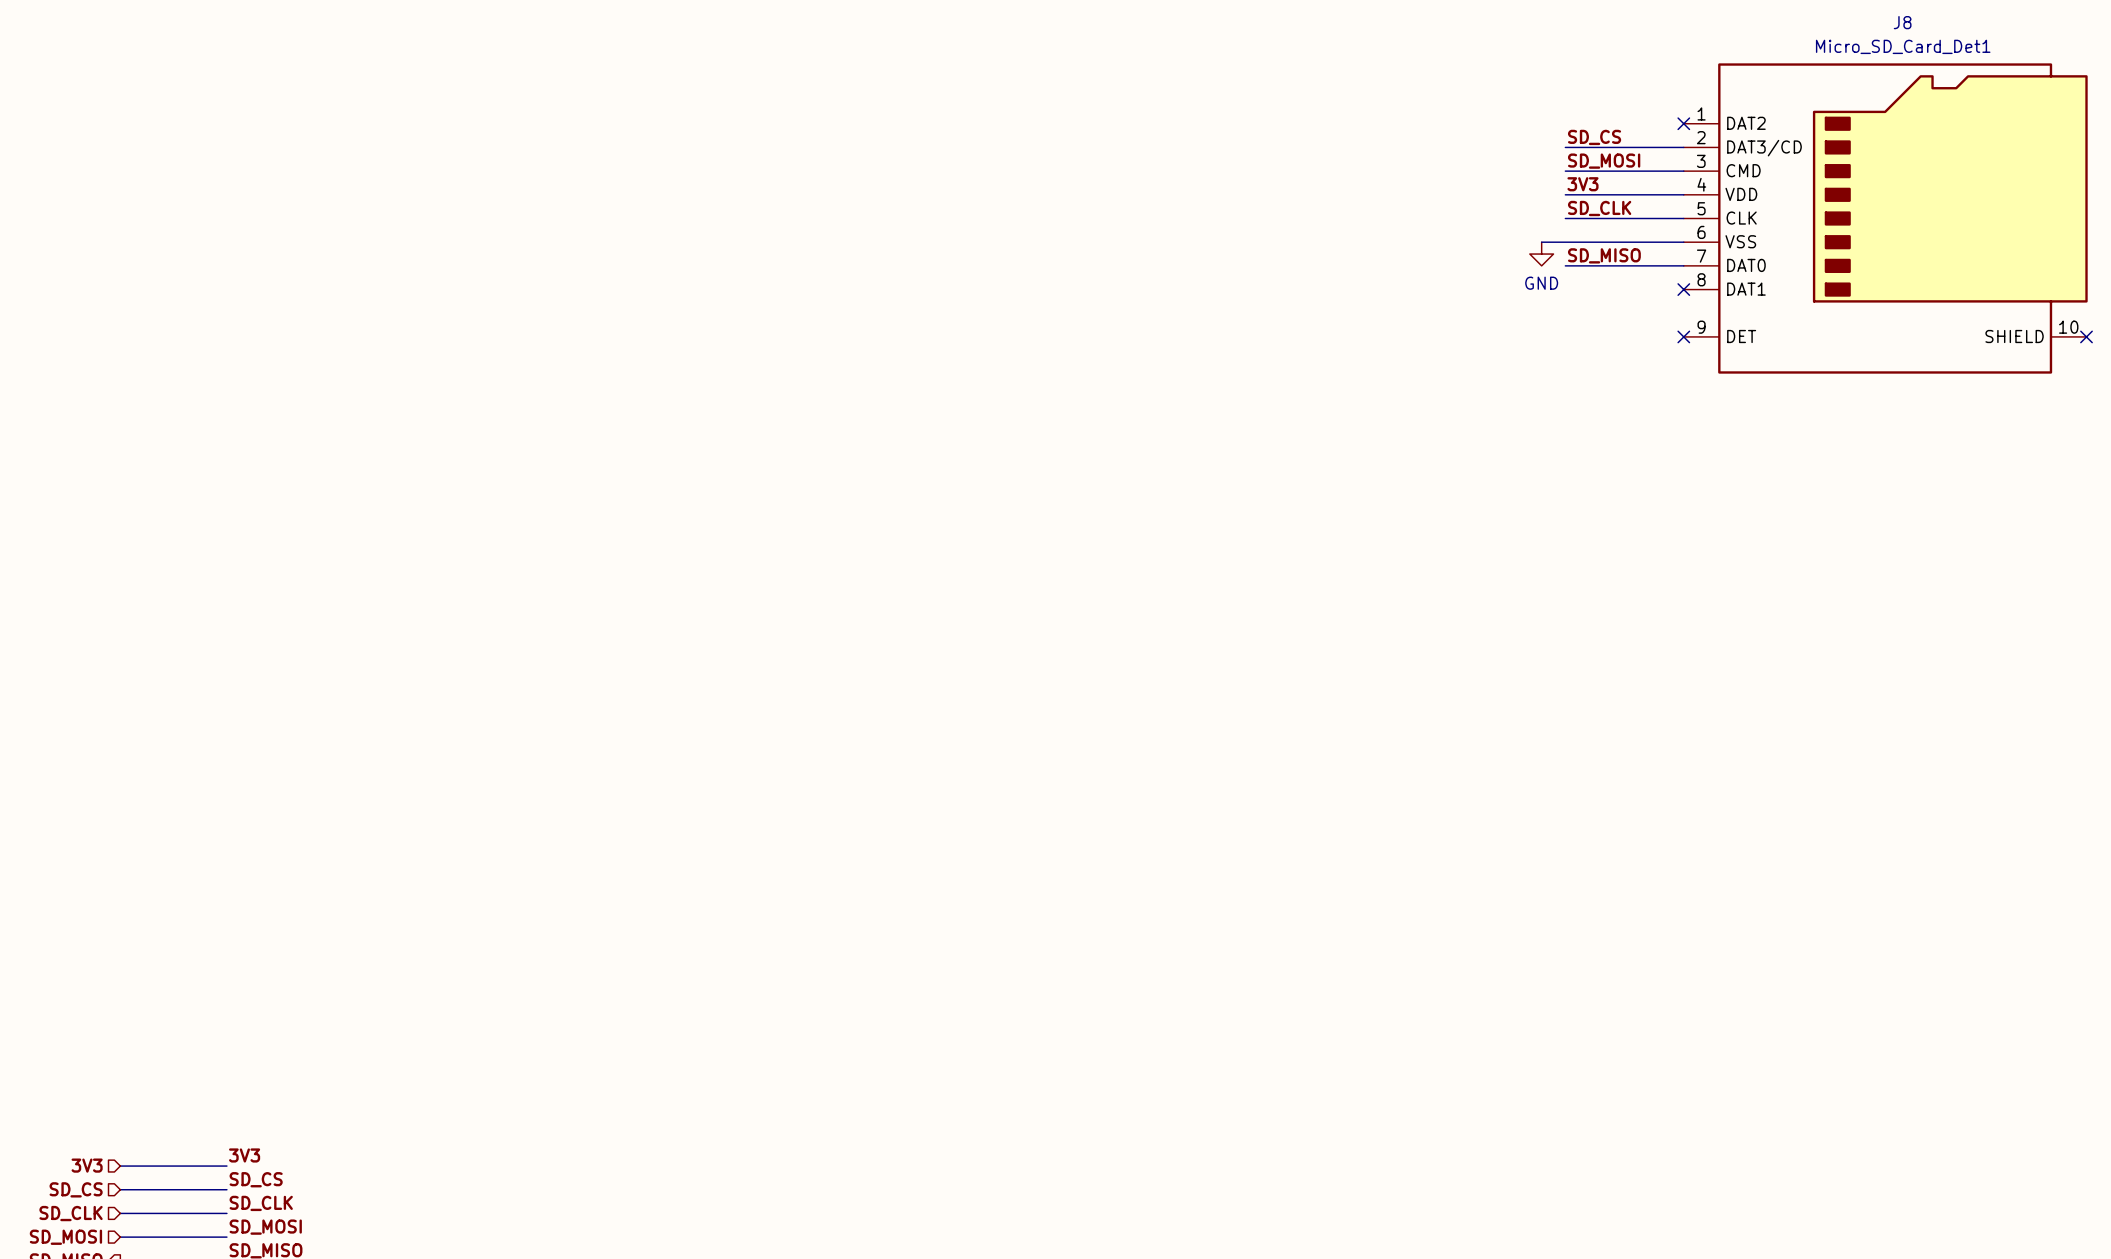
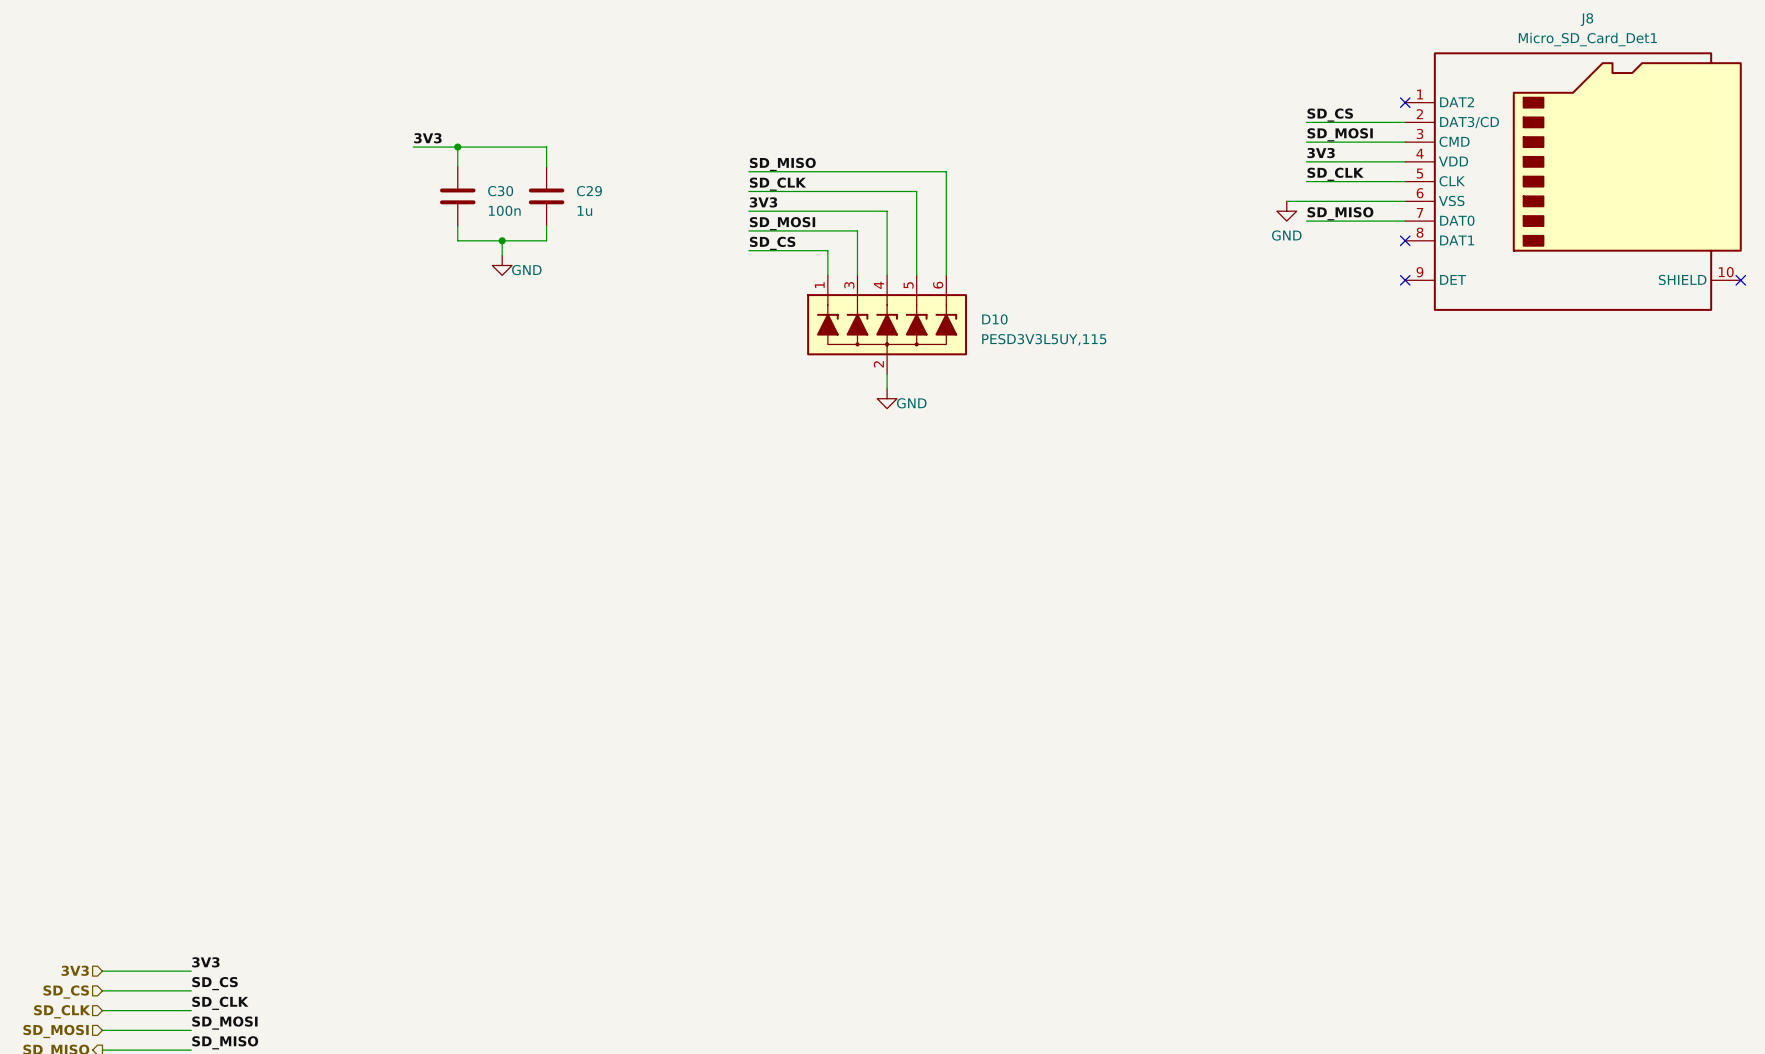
label: none -> 3V3 (427, 138)
wire: none -> (413, 147) (546, 147) (546, 166)
wire: none -> (457, 147) (457, 166)
junction: none -> (457, 147)
label: none -> SD_MISO (782, 164)
wire: none -> (748, 171) (946, 171) (946, 275)
label: none -> SD_CLK (778, 184)
wire: none -> (748, 191) (916, 191) (916, 275)
C30: none -> 100n (457, 196)
C29: none -> 1u (546, 196)
label: none -> 3V3 (763, 202)
wire: none -> (748, 211) (887, 211) (887, 275)
label: none -> SD_MOSI (782, 223)
wire: none -> (457, 226) (457, 240) (546, 240) (546, 226)
wire: none -> (748, 230) (857, 230) (857, 275)
wire: none -> (502, 240) (502, 255)
junction: none -> (502, 240)
label: none -> SD_CS (772, 243)
wire: none -> (748, 250) (827, 250) (827, 275)
power symbol: none -> GND (502, 265)
D10: none -> PESD3V3L5UY,115 (887, 324)
wire: none -> (887, 374) (887, 388)
power symbol: none -> GND (887, 398)

